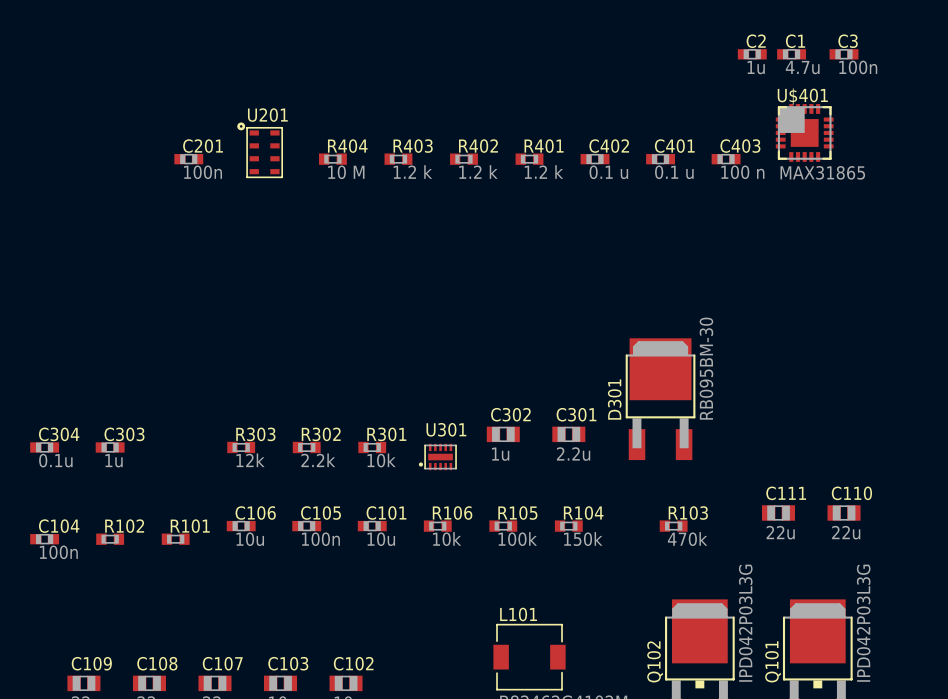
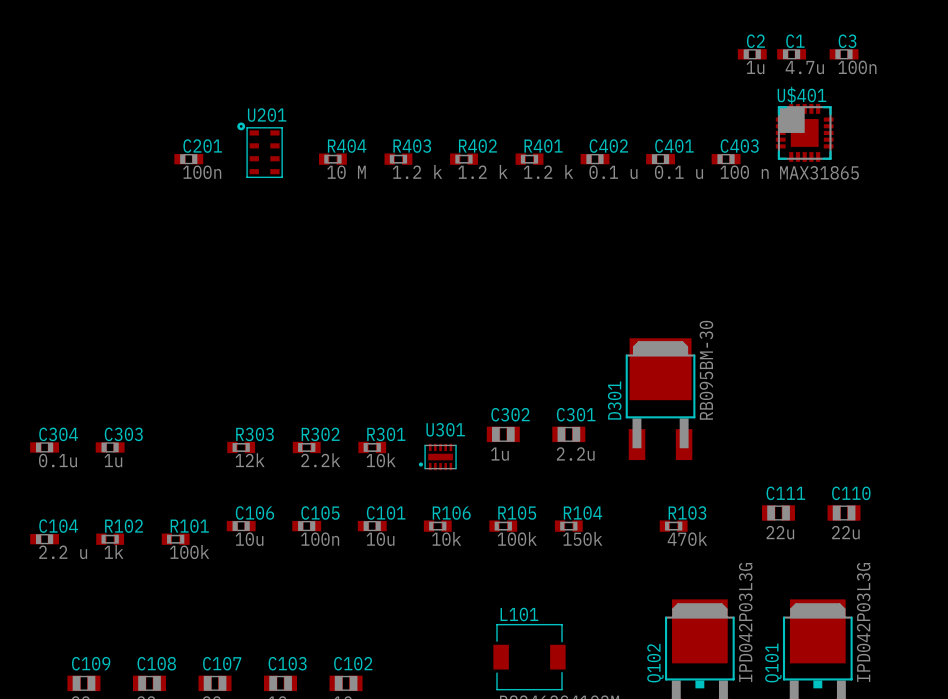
C104 value: 100n (58, 552) -> 2.2 u (63, 552)
R102 value: none -> 1k (113, 551)
R101 value: none -> 100k (189, 552)

